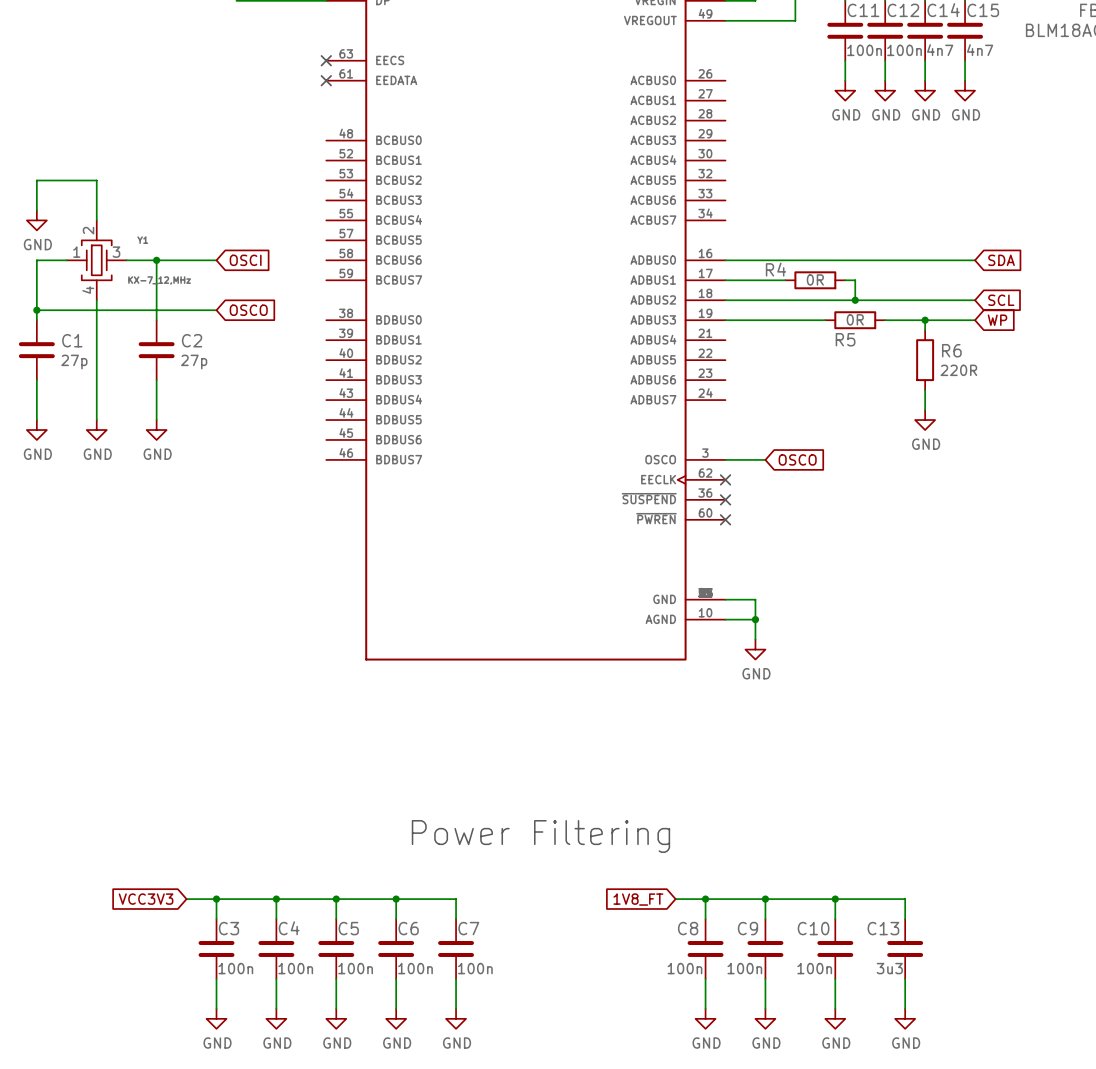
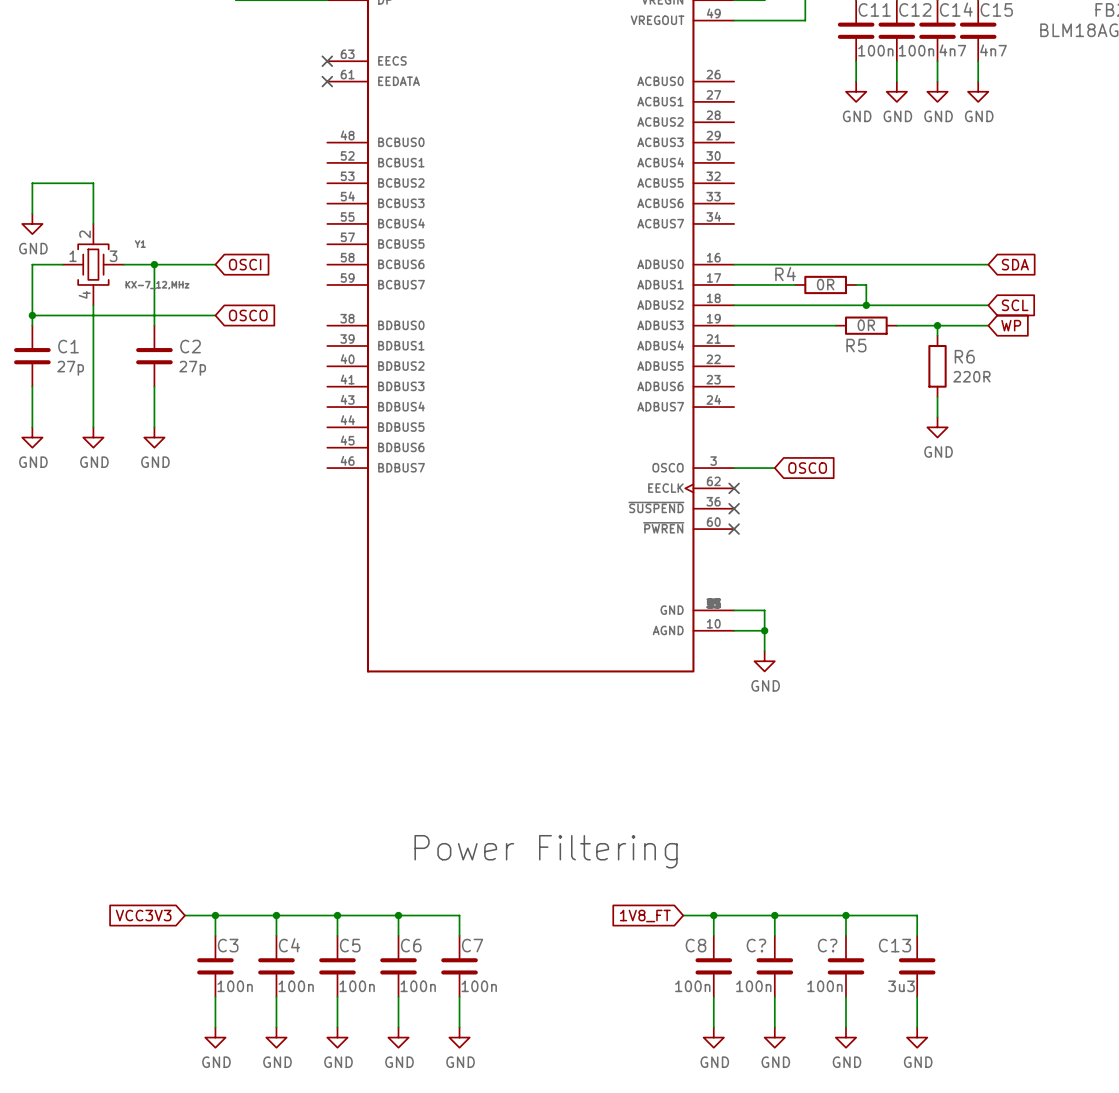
C9 name: C9 (747, 928) -> C? (756, 945)
C10 name: C10 (813, 928) -> C? (827, 945)

